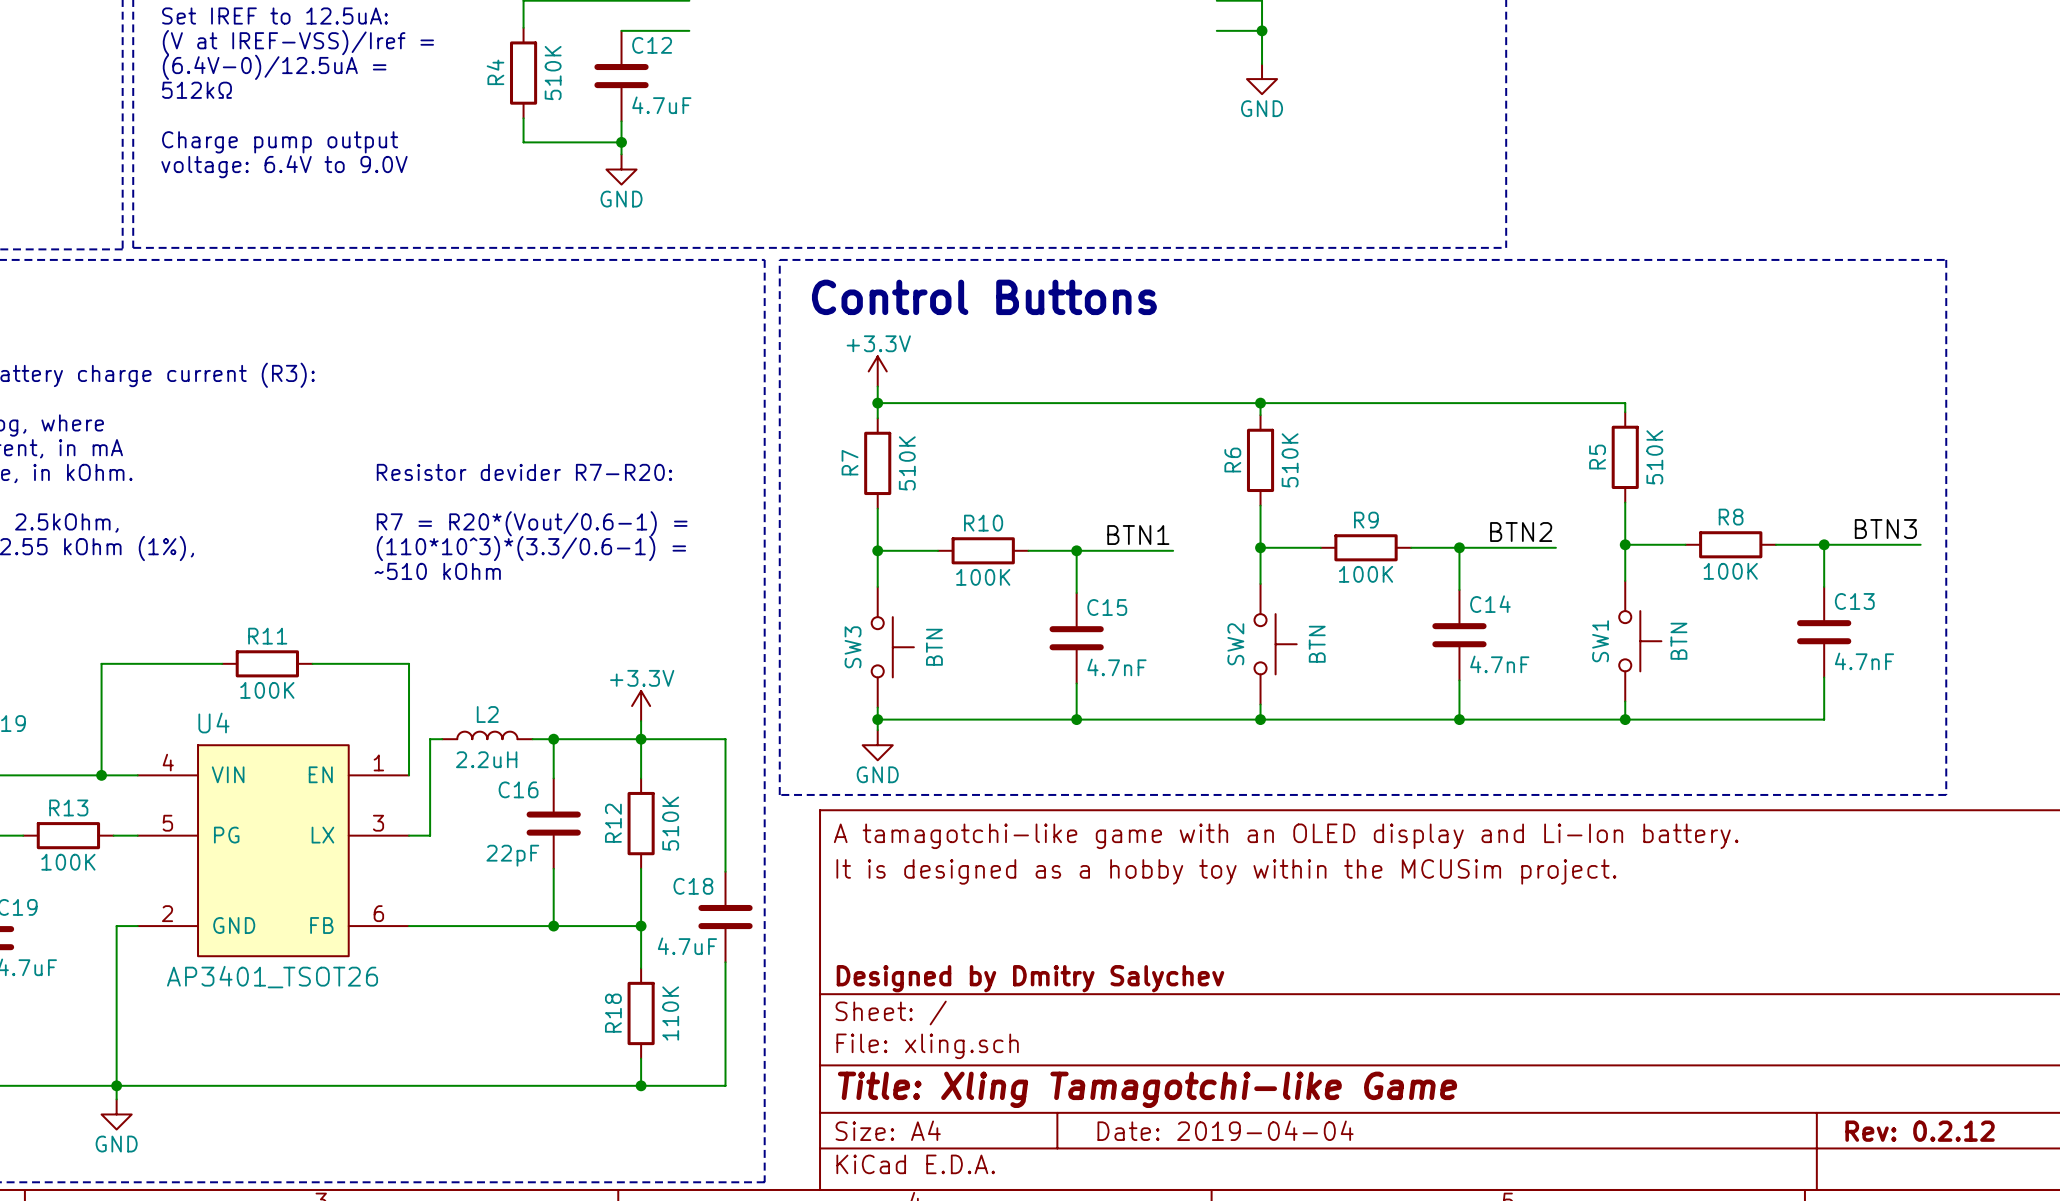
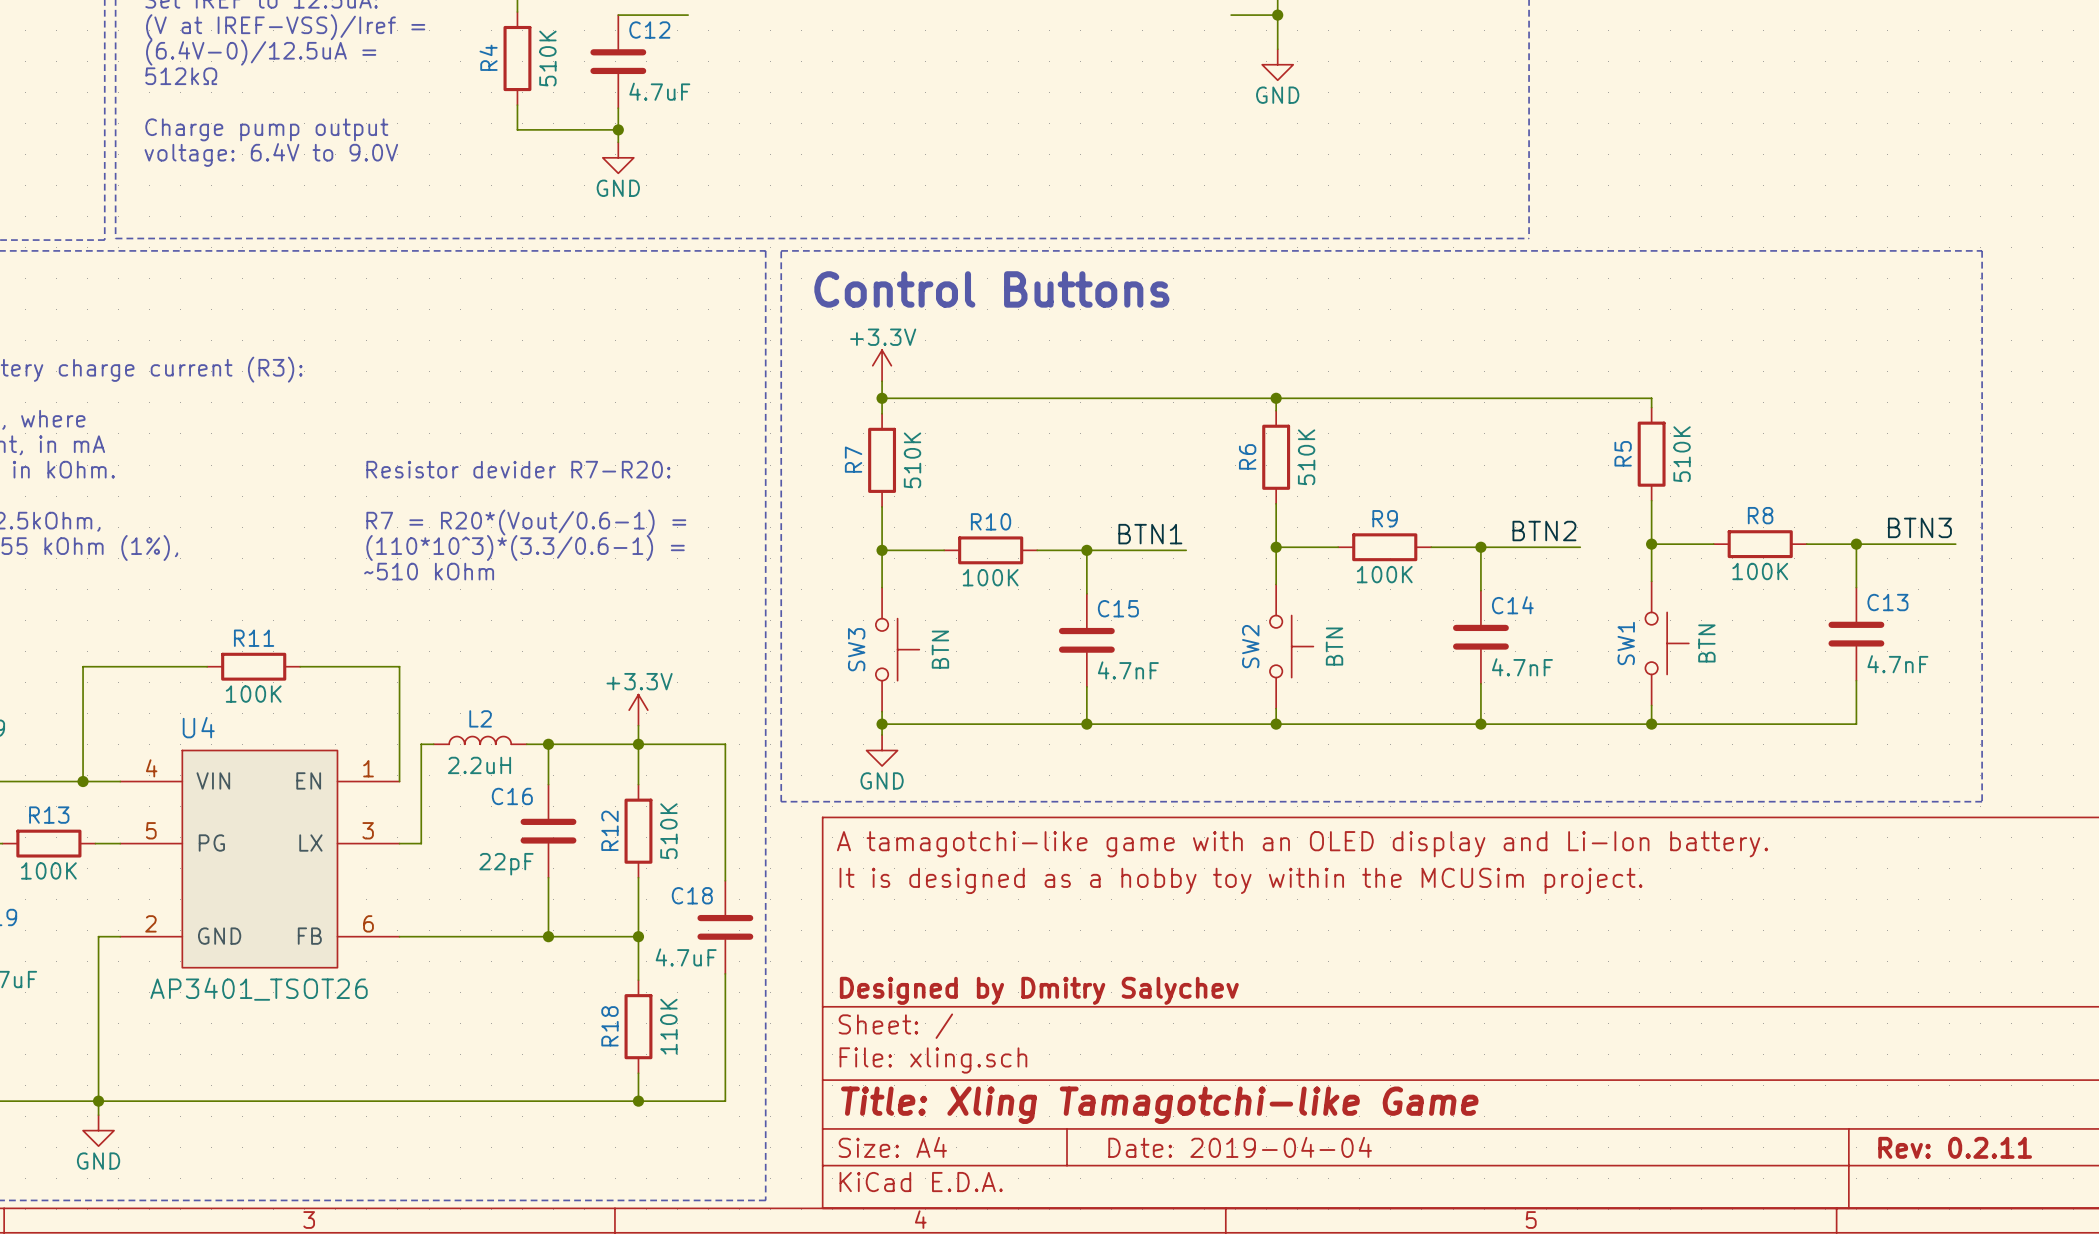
title block: Rev: 0.2.12 (1920, 1131) -> Rev: 0.2.11 (1955, 1147)

